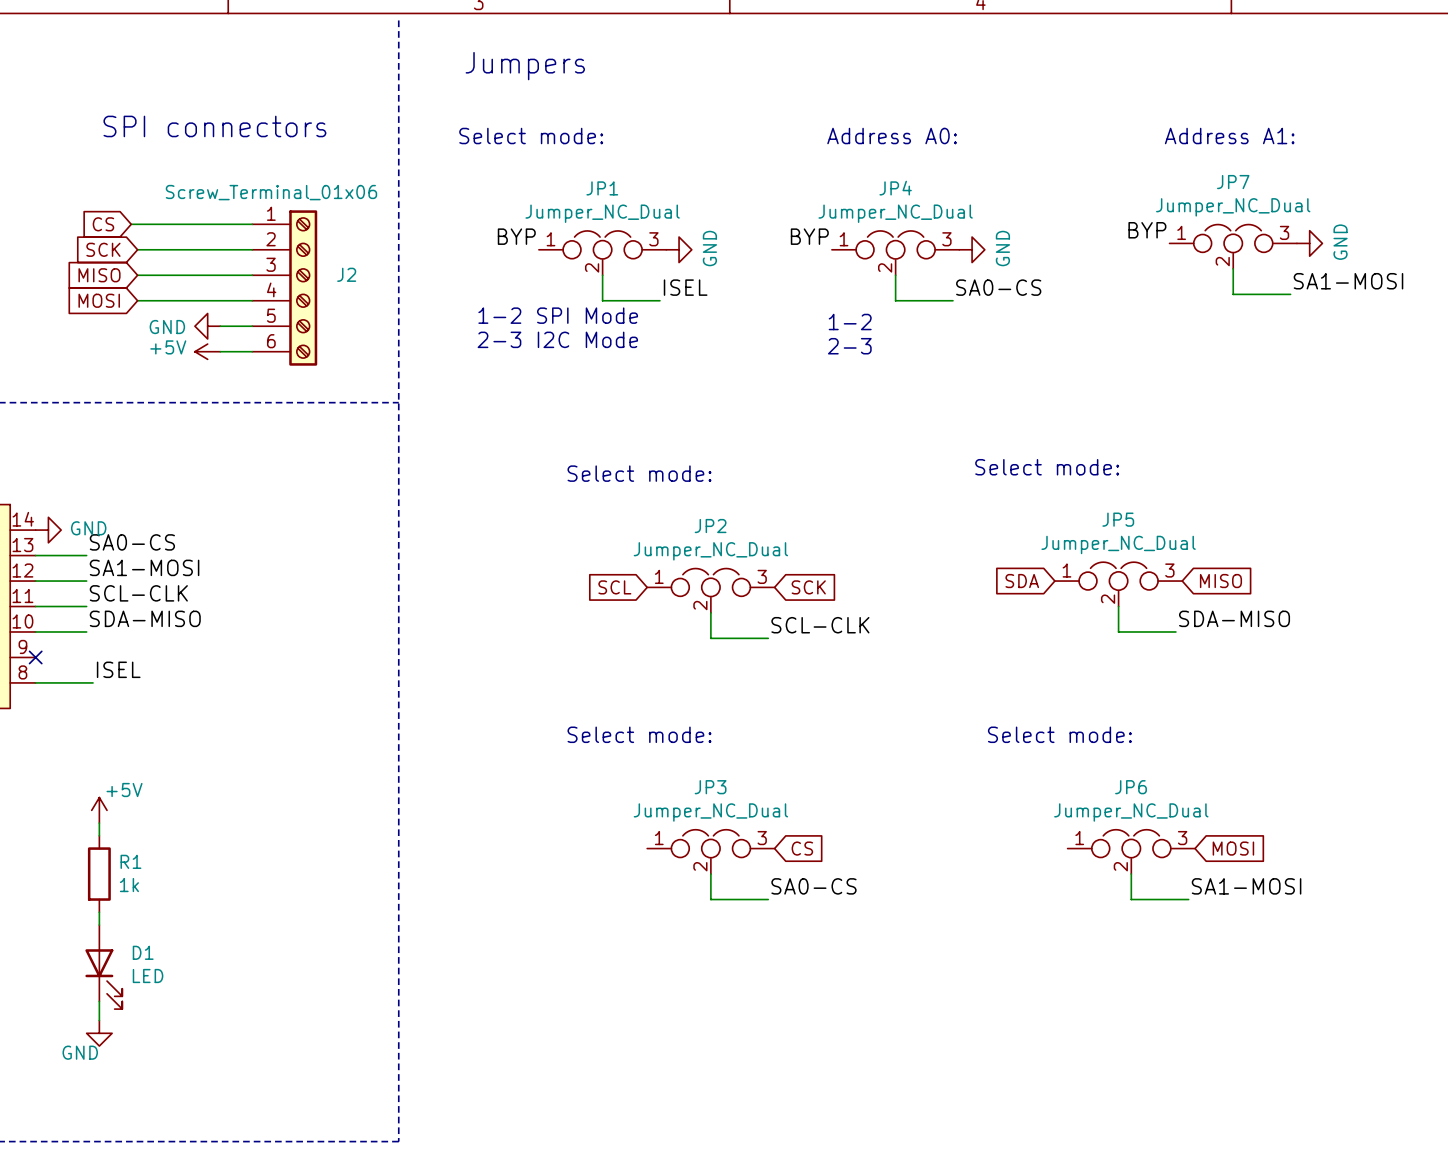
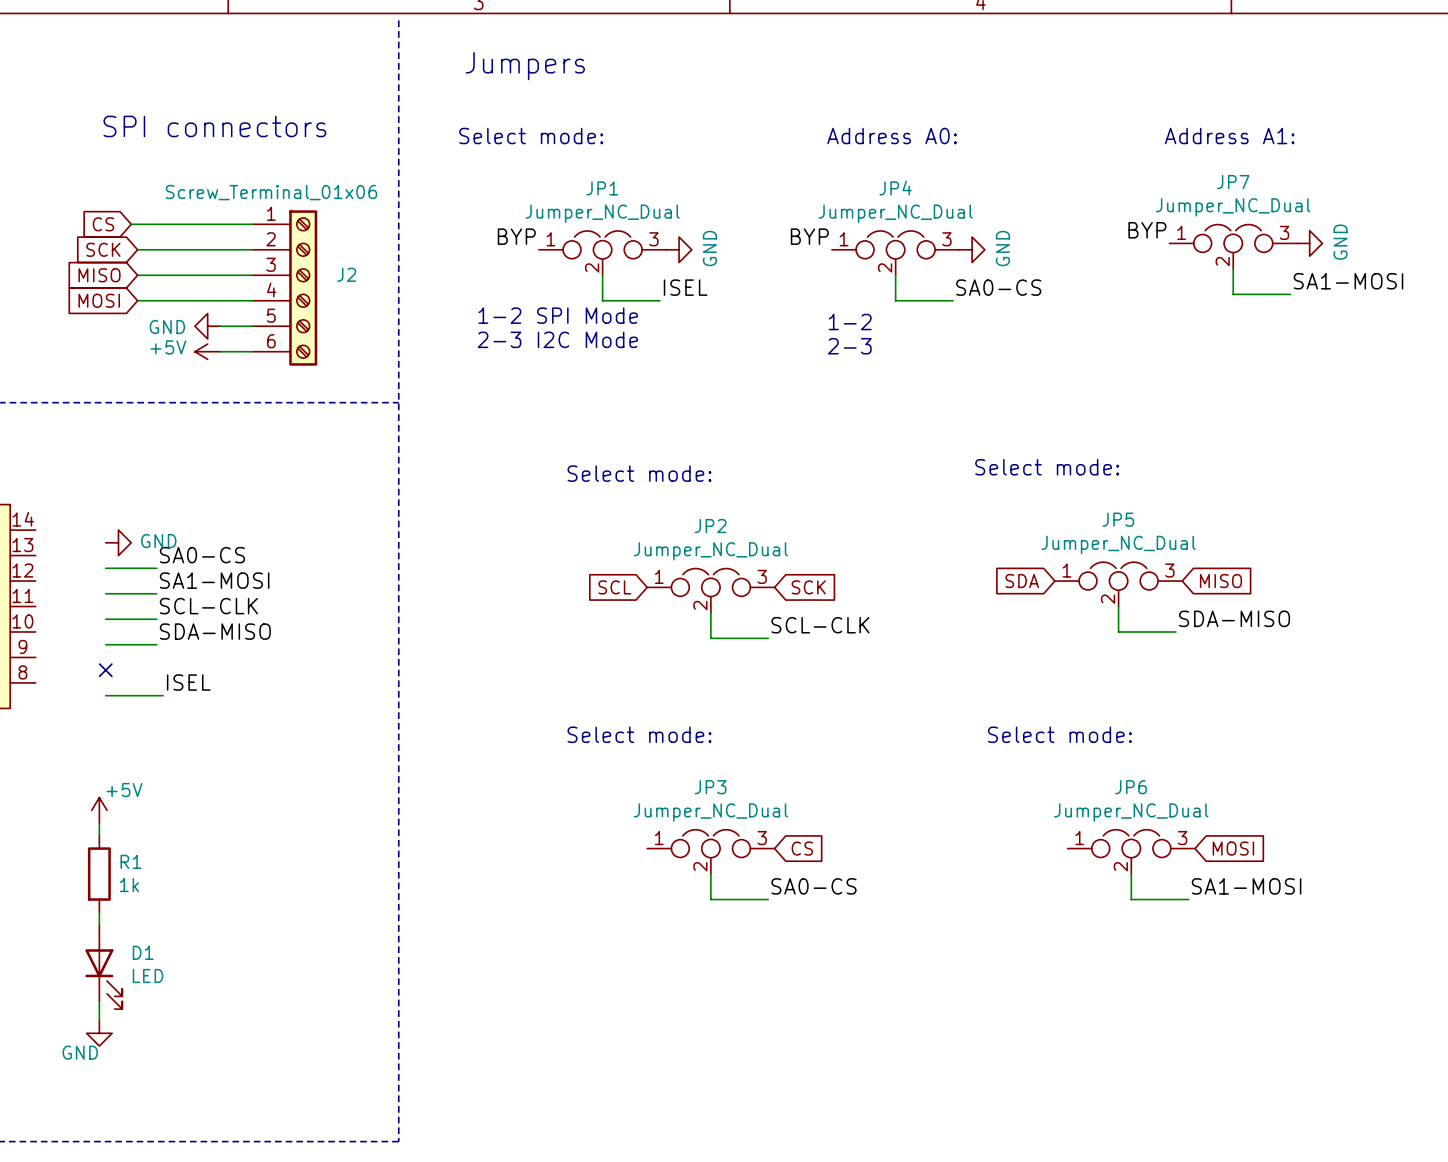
power symbol position: GND (48, 530) -> GND (118, 542)
label position: SA0-CS (132, 542) -> SA0-CS (202, 555)
wire: (35, 555) (86, 555) -> (105, 568) (156, 568)
label position: SA1-MOSI (144, 567) -> SA1-MOSI (214, 580)
wire: (35, 581) (86, 581) -> (105, 593) (156, 593)
label position: SCL-CLK (138, 593) -> SCL-CLK (208, 606)
wire: (35, 606) (86, 606) -> (105, 619) (156, 619)
label position: SDA-MISO (145, 618) -> SDA-MISO (215, 631)
wire: (35, 631) (86, 631) -> (105, 644) (156, 644)
no-connect mark: (35, 657) -> none
label position: ISEL (118, 669) -> ISEL (188, 682)
no-connect mark: none -> (105, 670)
wire: (35, 682) (93, 682) -> (105, 695) (163, 695)

